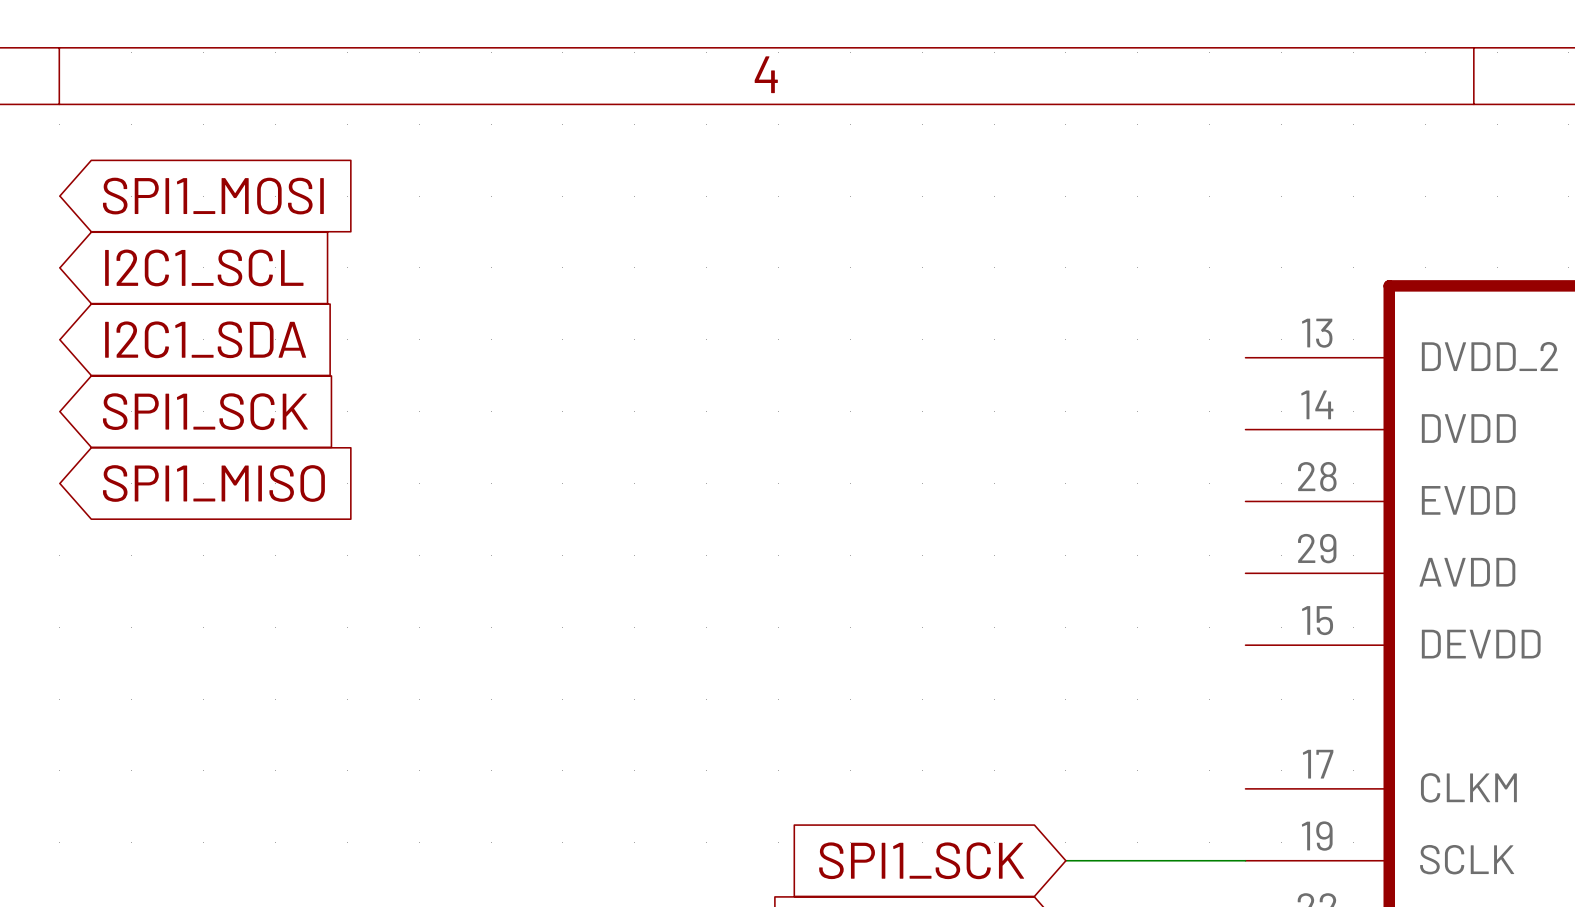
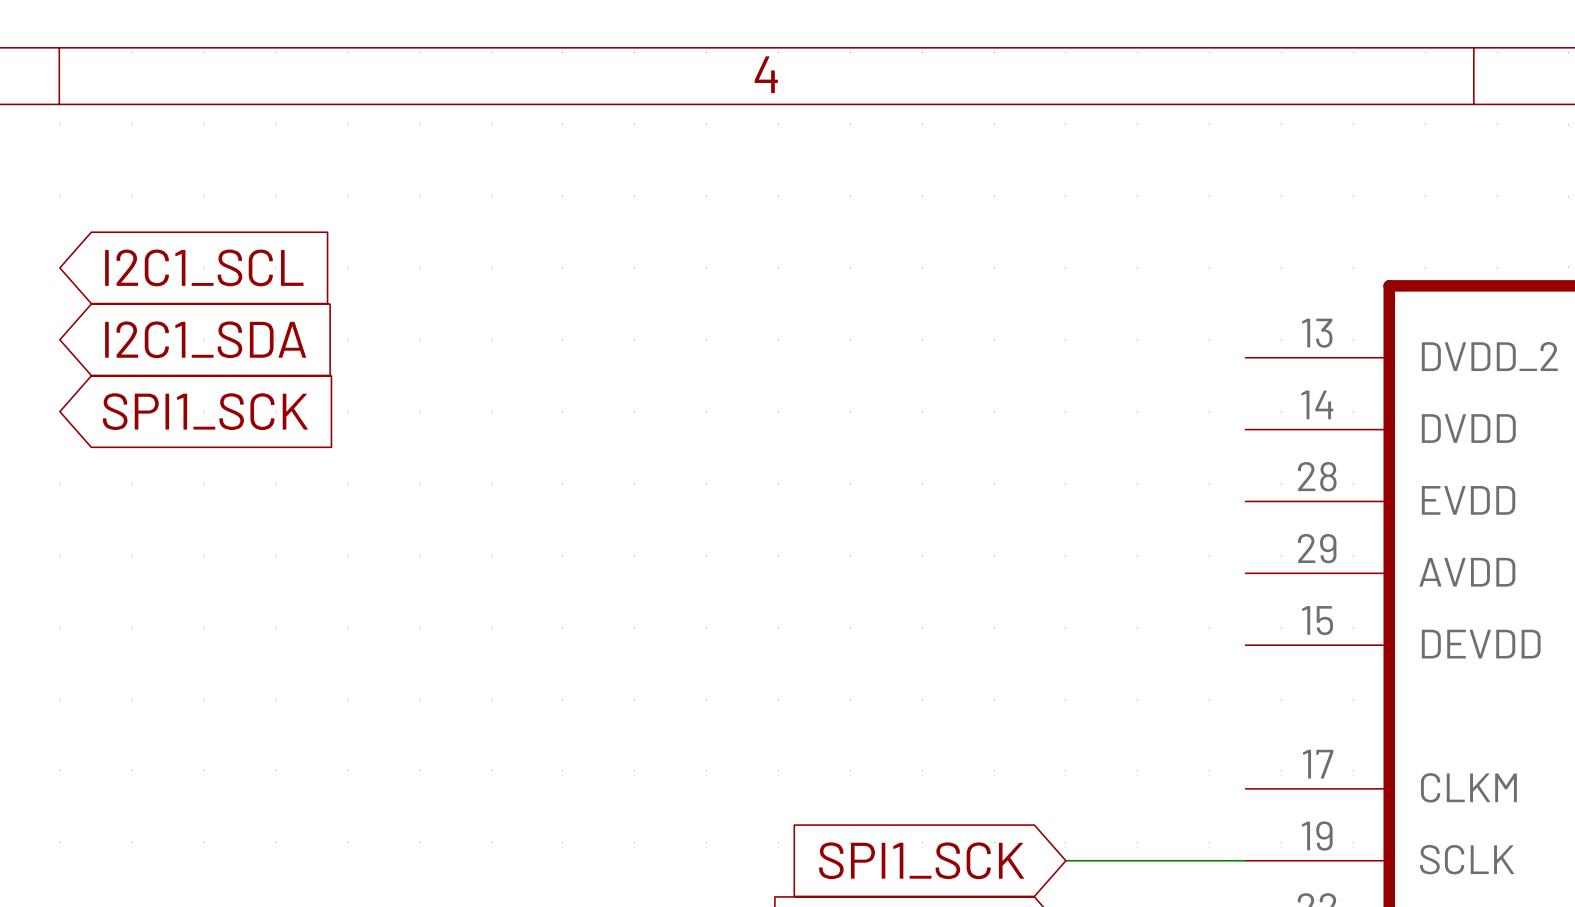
global label: SPI1_MOSI (213, 196) -> none
global label: SPI1_MISO (213, 483) -> none

